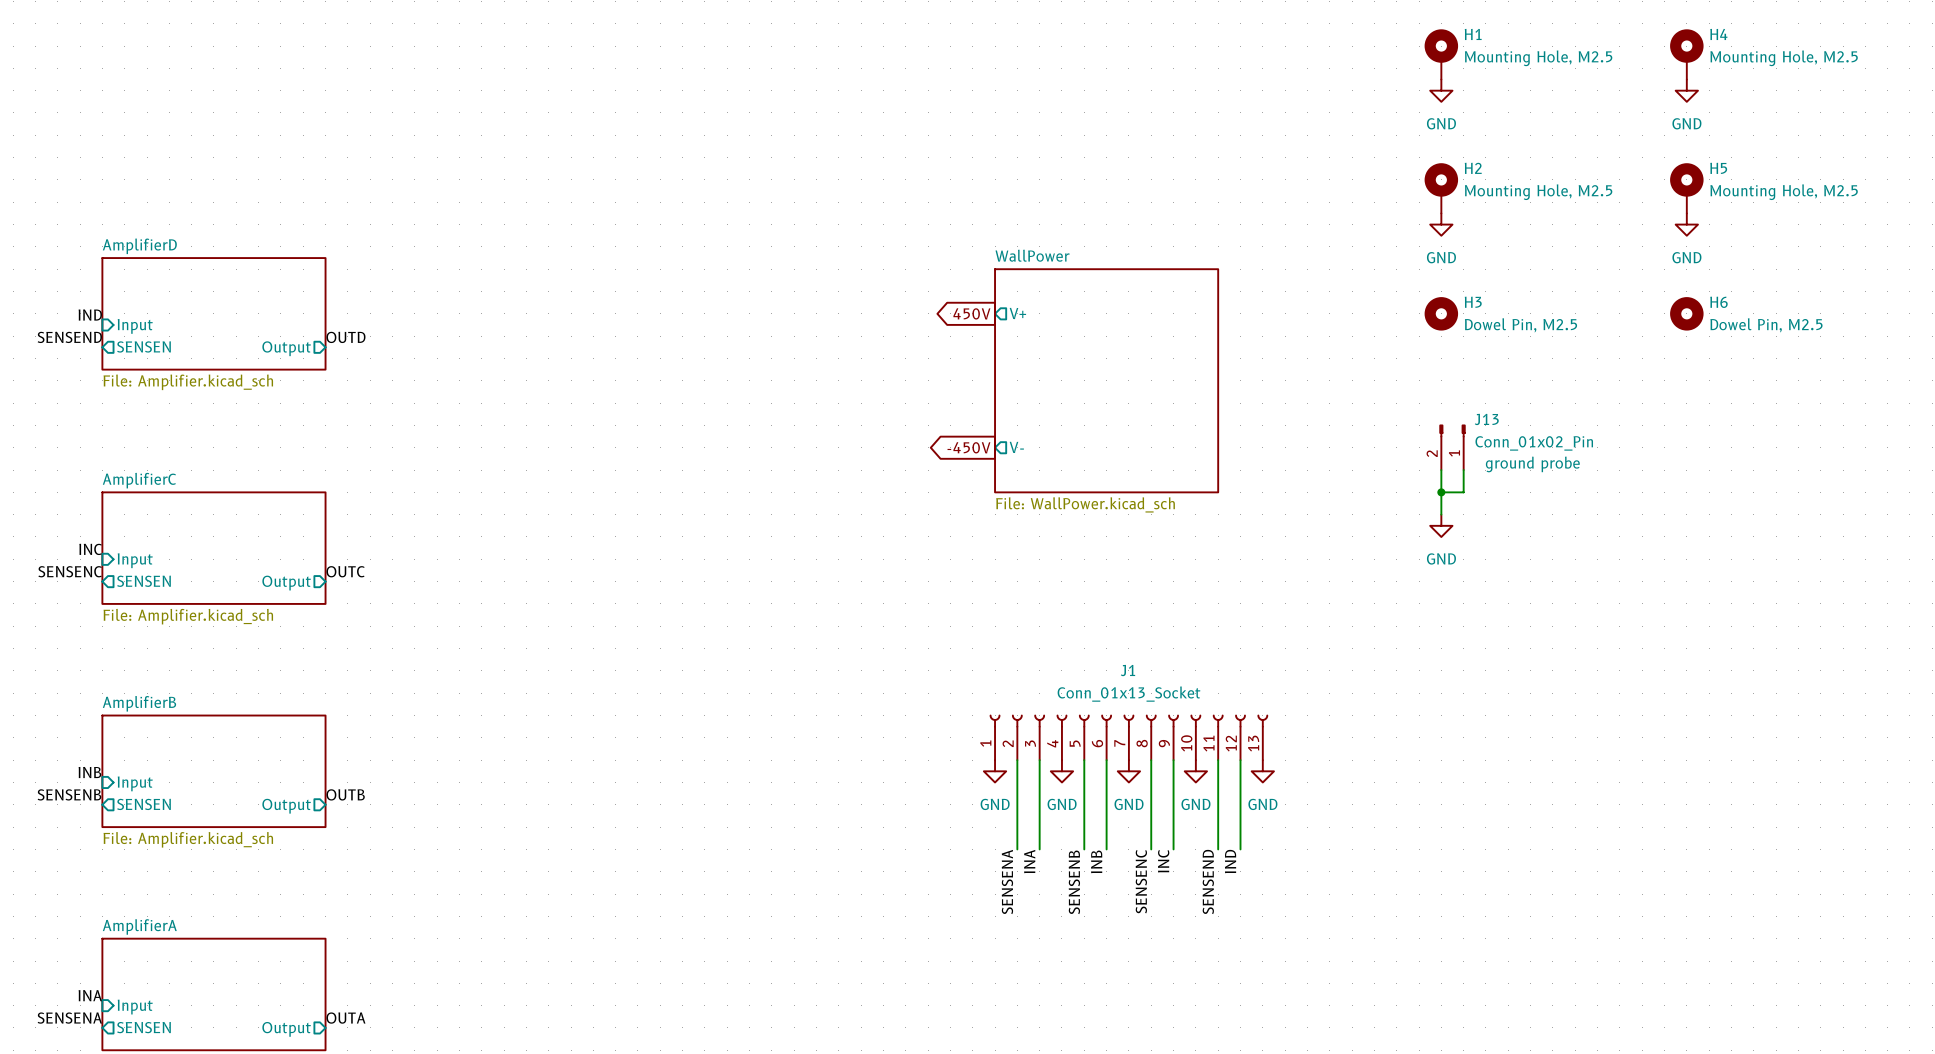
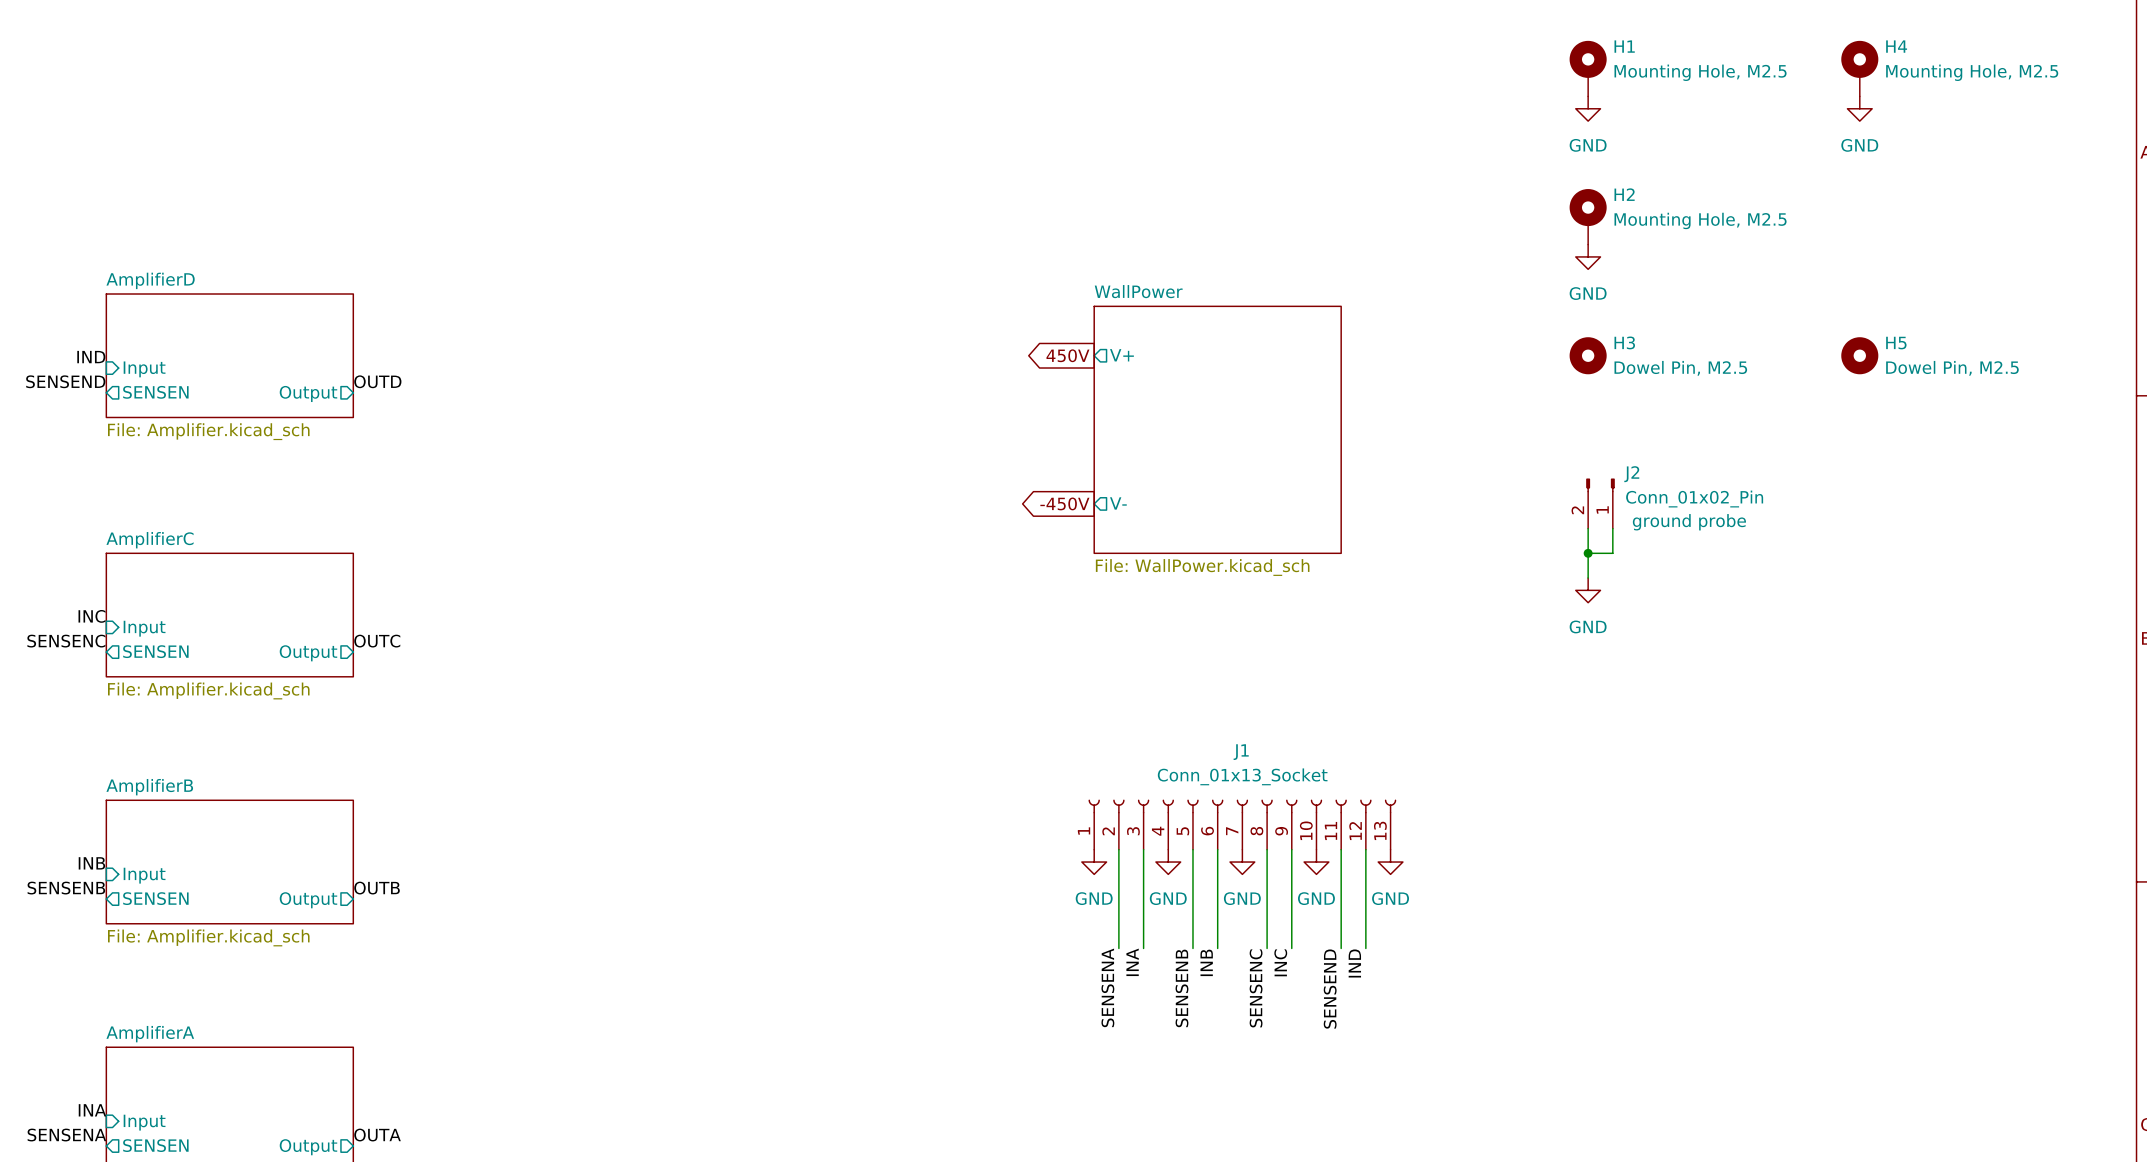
H5: Mounting Hole, M2.5 (1686, 188) -> none
power symbol: GND (1686, 224) -> none
H6 name: H6 (1718, 302) -> H5 (1896, 343)
J13 name: J13 (1486, 419) -> J2 (1631, 474)

